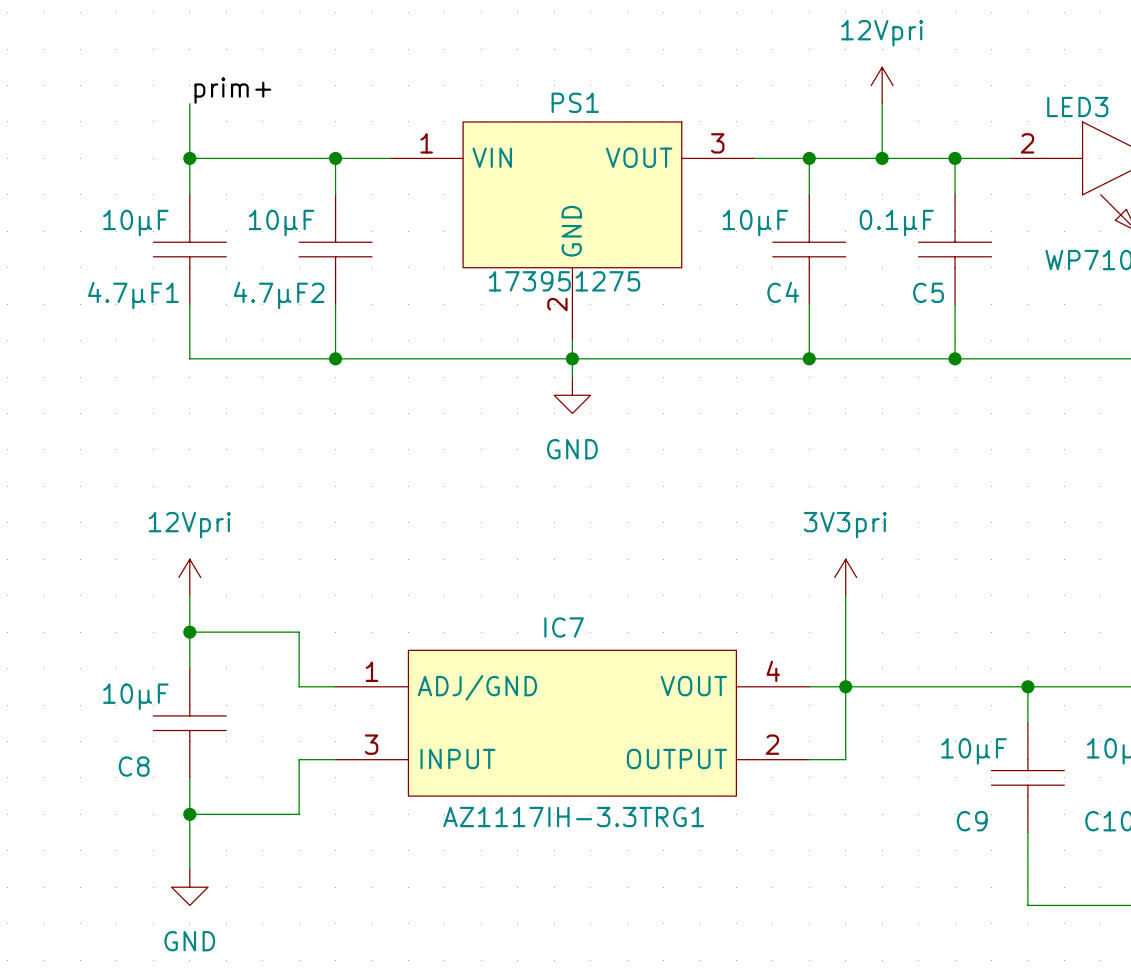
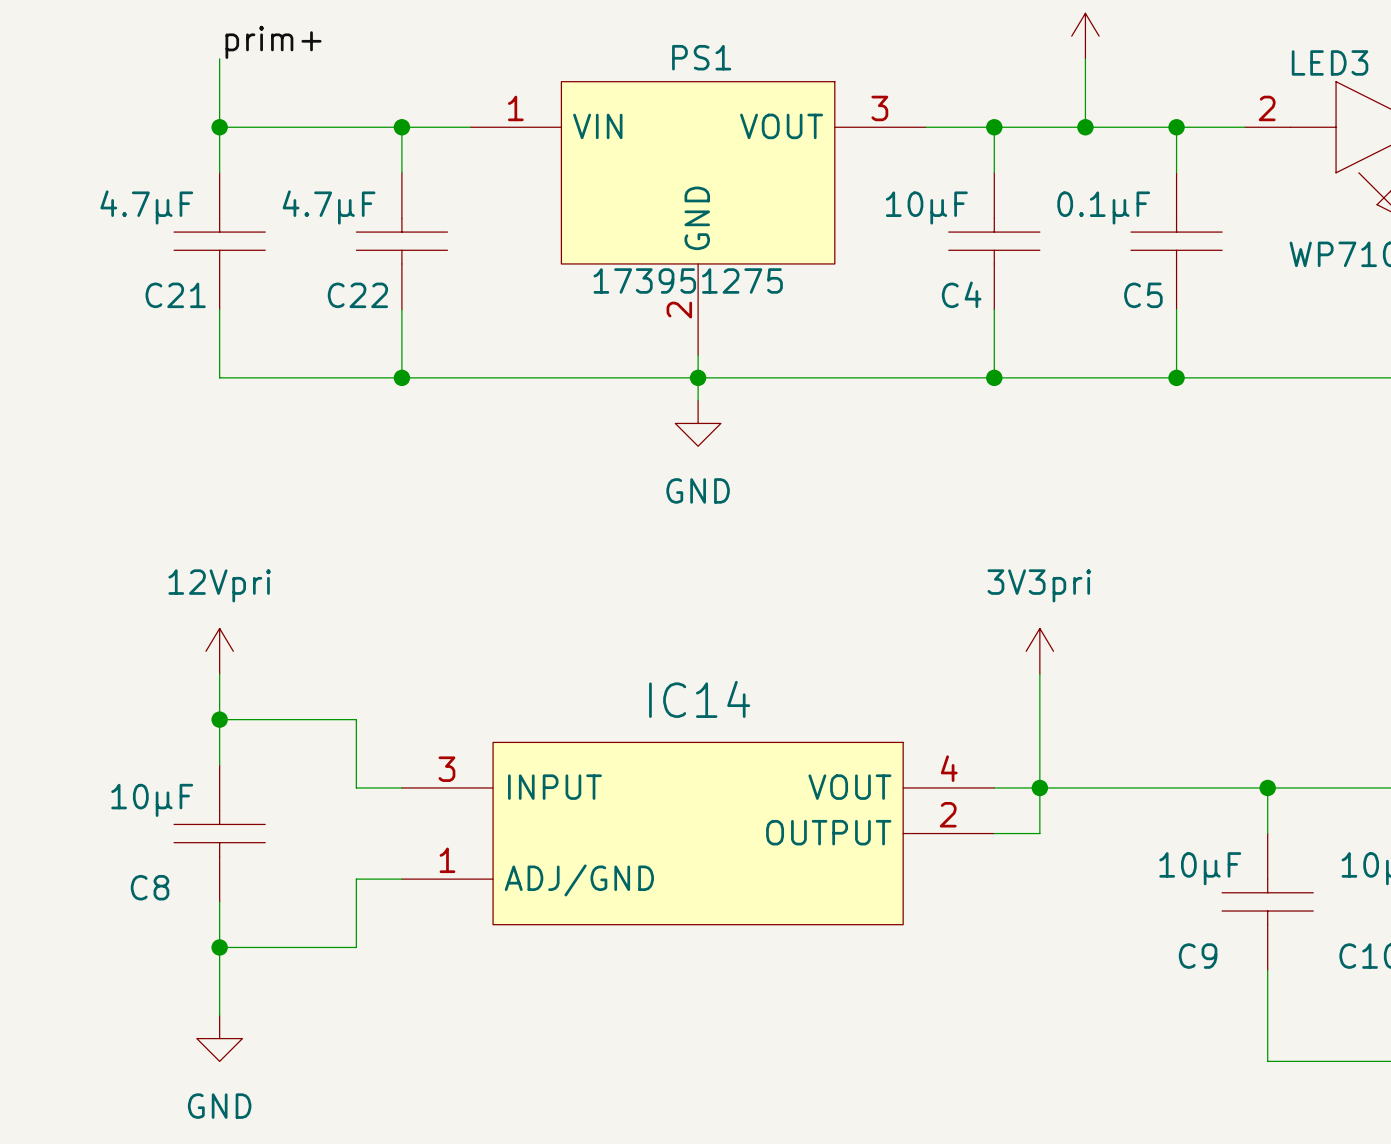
4.7µF1 value: 10µF (135, 222) -> 4.7µF (146, 207)
4.7µF2 value: 10µF (281, 222) -> 4.7µF (329, 207)
4.7µF1 name: 4.7µF1 (133, 295) -> C21 (175, 295)
4.7µF2 name: 4.7µF2 (279, 295) -> C22 (357, 295)
IC7: AZ1117IH-3.3TRG1 (572, 723) -> none
IC14: none -> (698, 833)
wire: (845, 723) (845, 759) (809, 759) -> (1039, 833) (994, 833)

